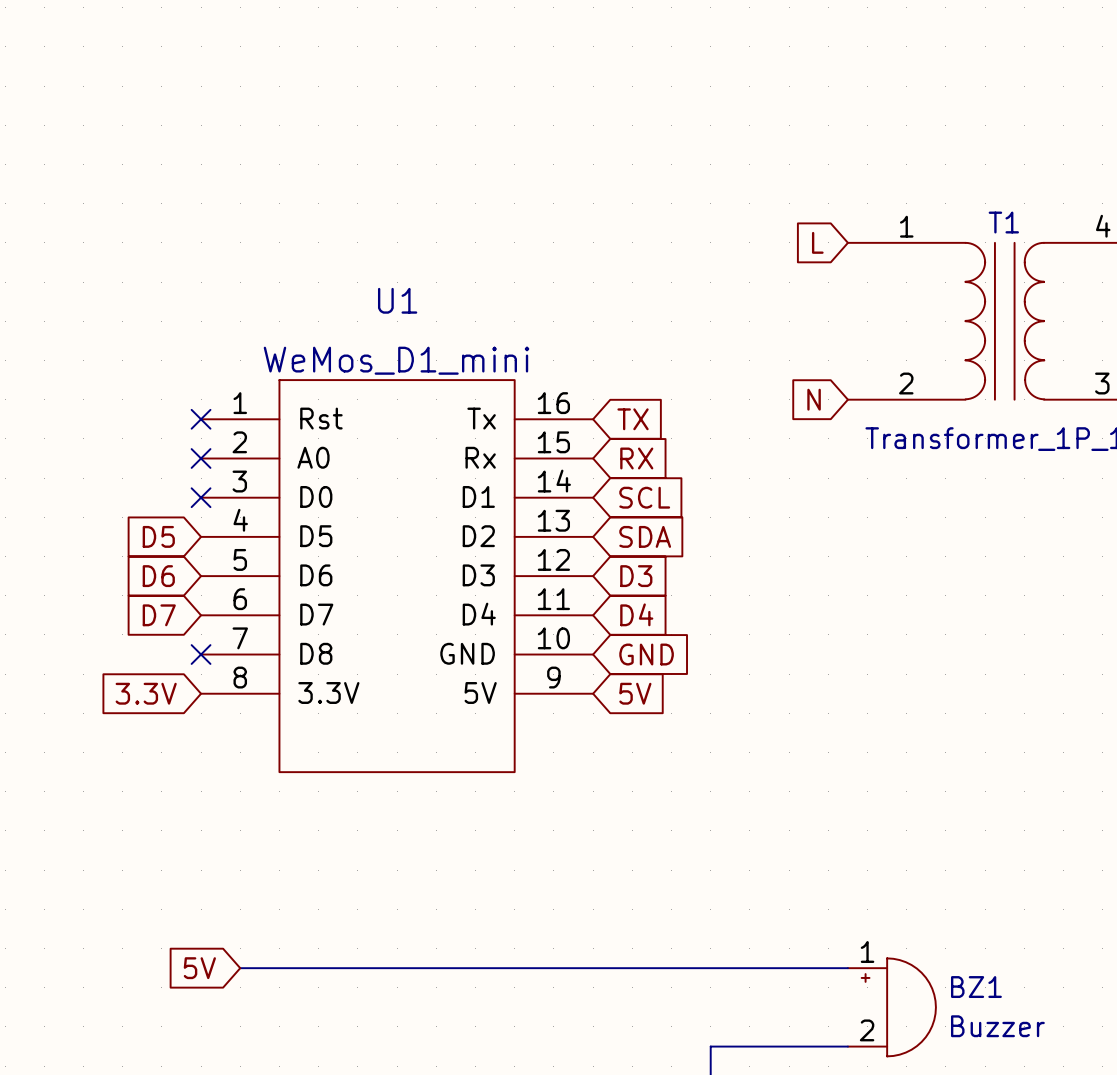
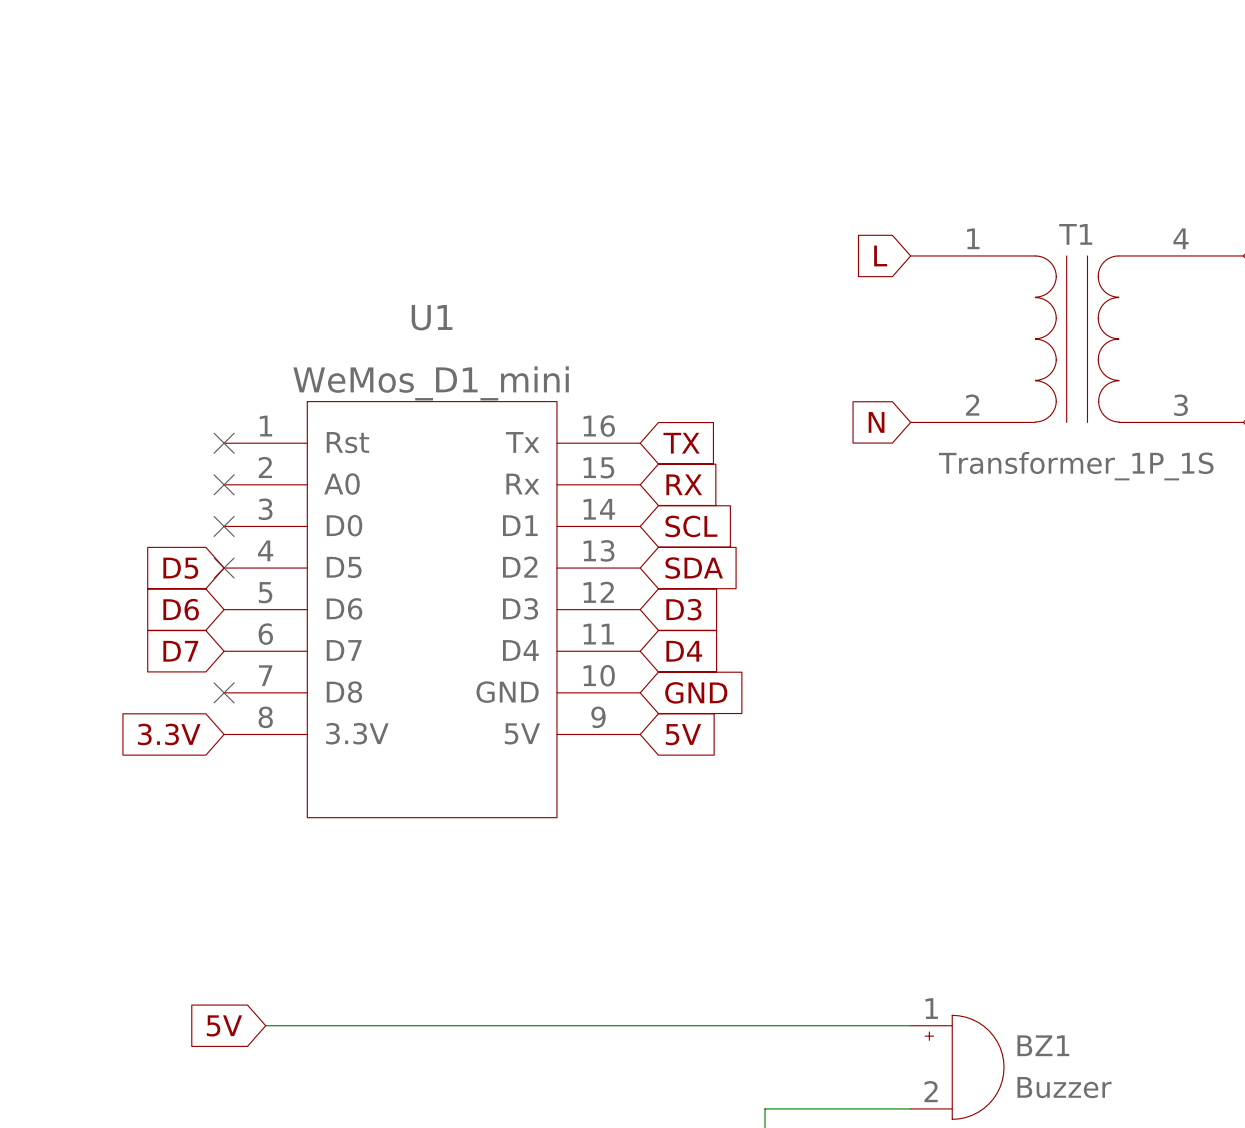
no-connect mark: none -> (224, 568)

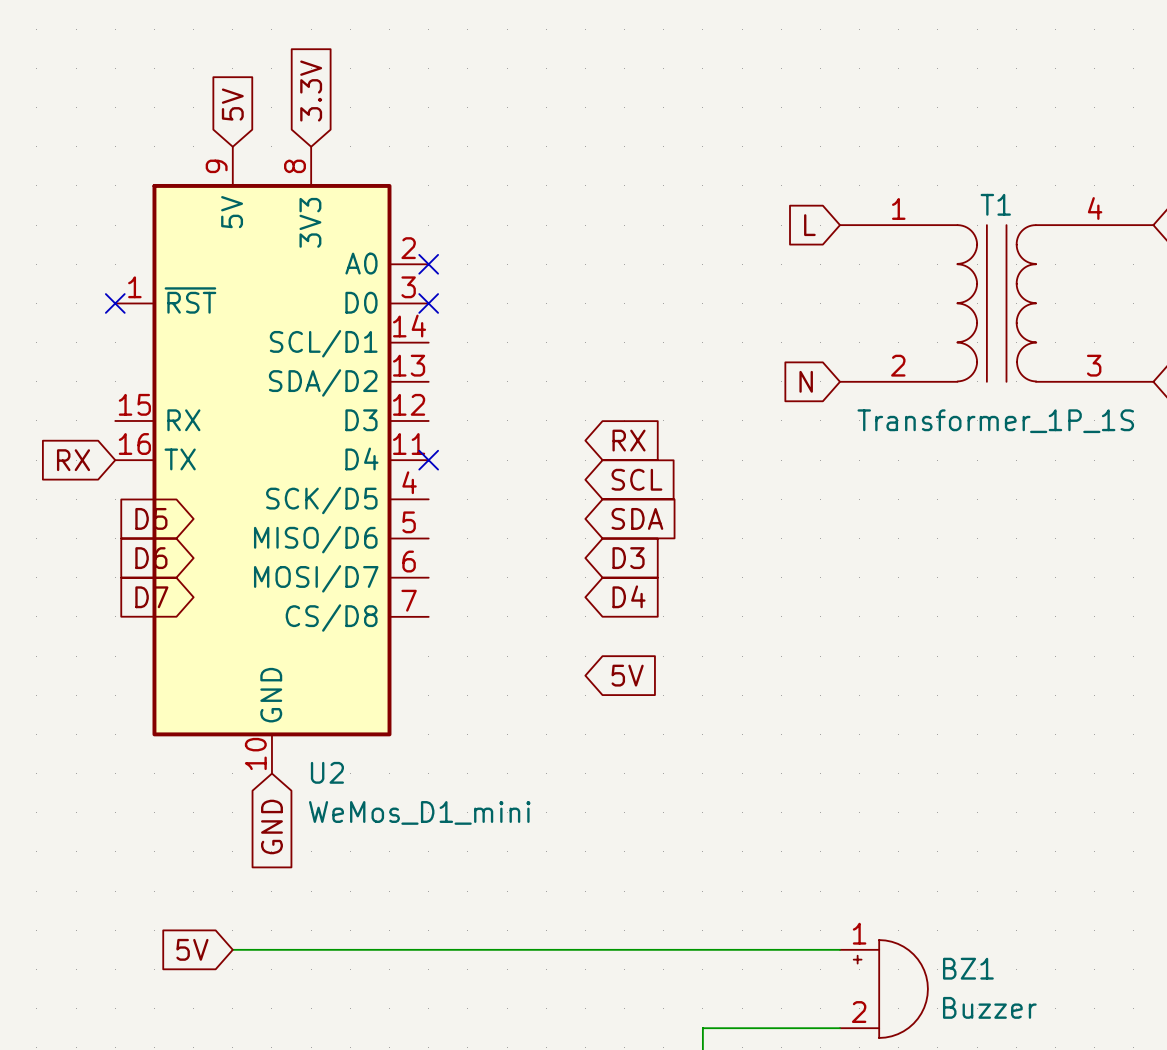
global label: none -> 3.3V (311, 91)
global label: none -> 5V (232, 104)
no-connect mark: none -> (428, 264)
no-connect mark: none -> (115, 303)
no-connect mark: none -> (428, 303)
no-connect mark: (224, 443) -> none
global label: TX (681, 443) -> none
no-connect mark: (224, 484) -> none
global label: none -> RX (73, 460)
U2: none -> WeMos_D1_mini (271, 460)
no-connect mark: none -> (428, 460)
no-connect mark: (224, 526) -> none
no-connect mark: (224, 568) -> none
U1: WeMos_D1_mini (432, 609) -> none
no-connect mark: (224, 692) -> none
global label rotation: 0° (696, 692) -> 90° clockwise (271, 826)
global label position: GND (696, 692) -> GND (271, 826)
global label: 3.3V (169, 734) -> none

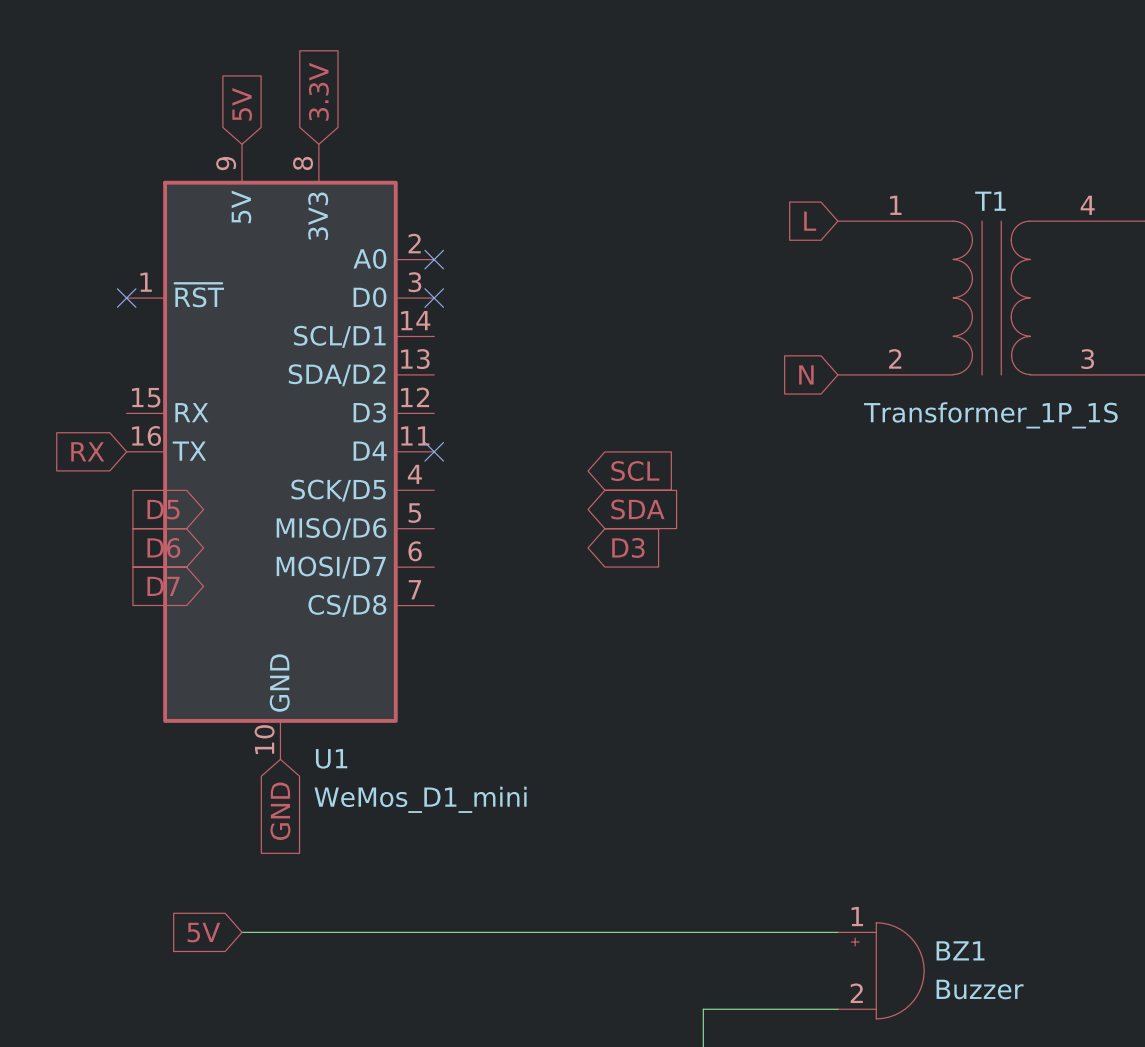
global label: RX (629, 440) -> none
global label: D4 (629, 596) -> none
global label: 5V (627, 675) -> none
U2 name: U2 (327, 772) -> U1 (331, 758)

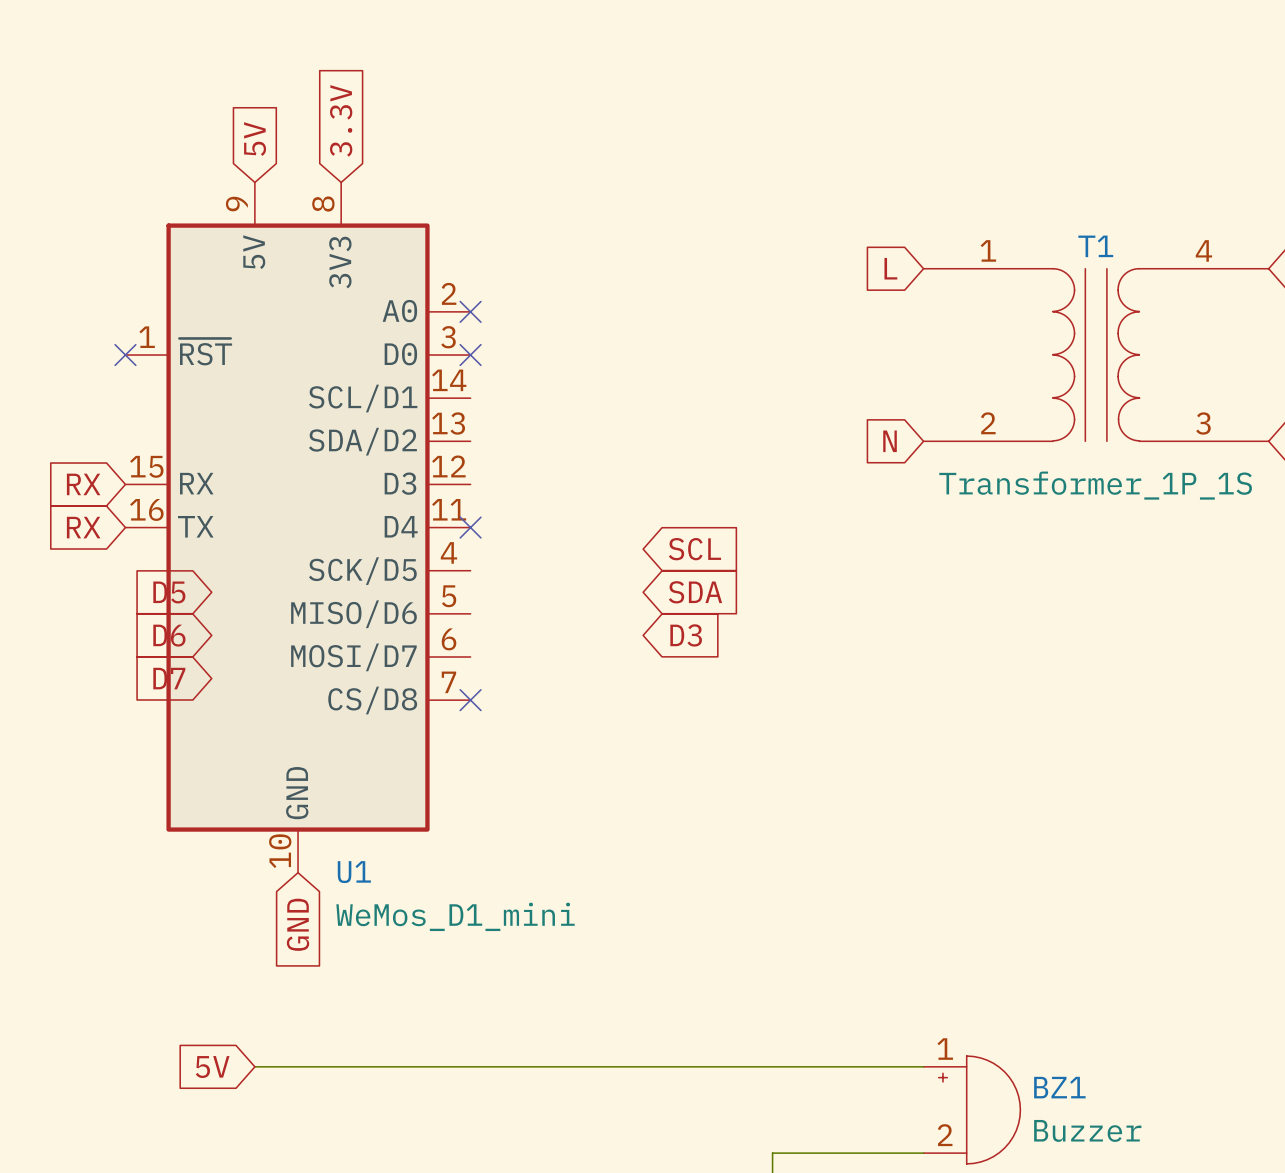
global label: none -> RX (83, 484)
no-connect mark: none -> (470, 700)

